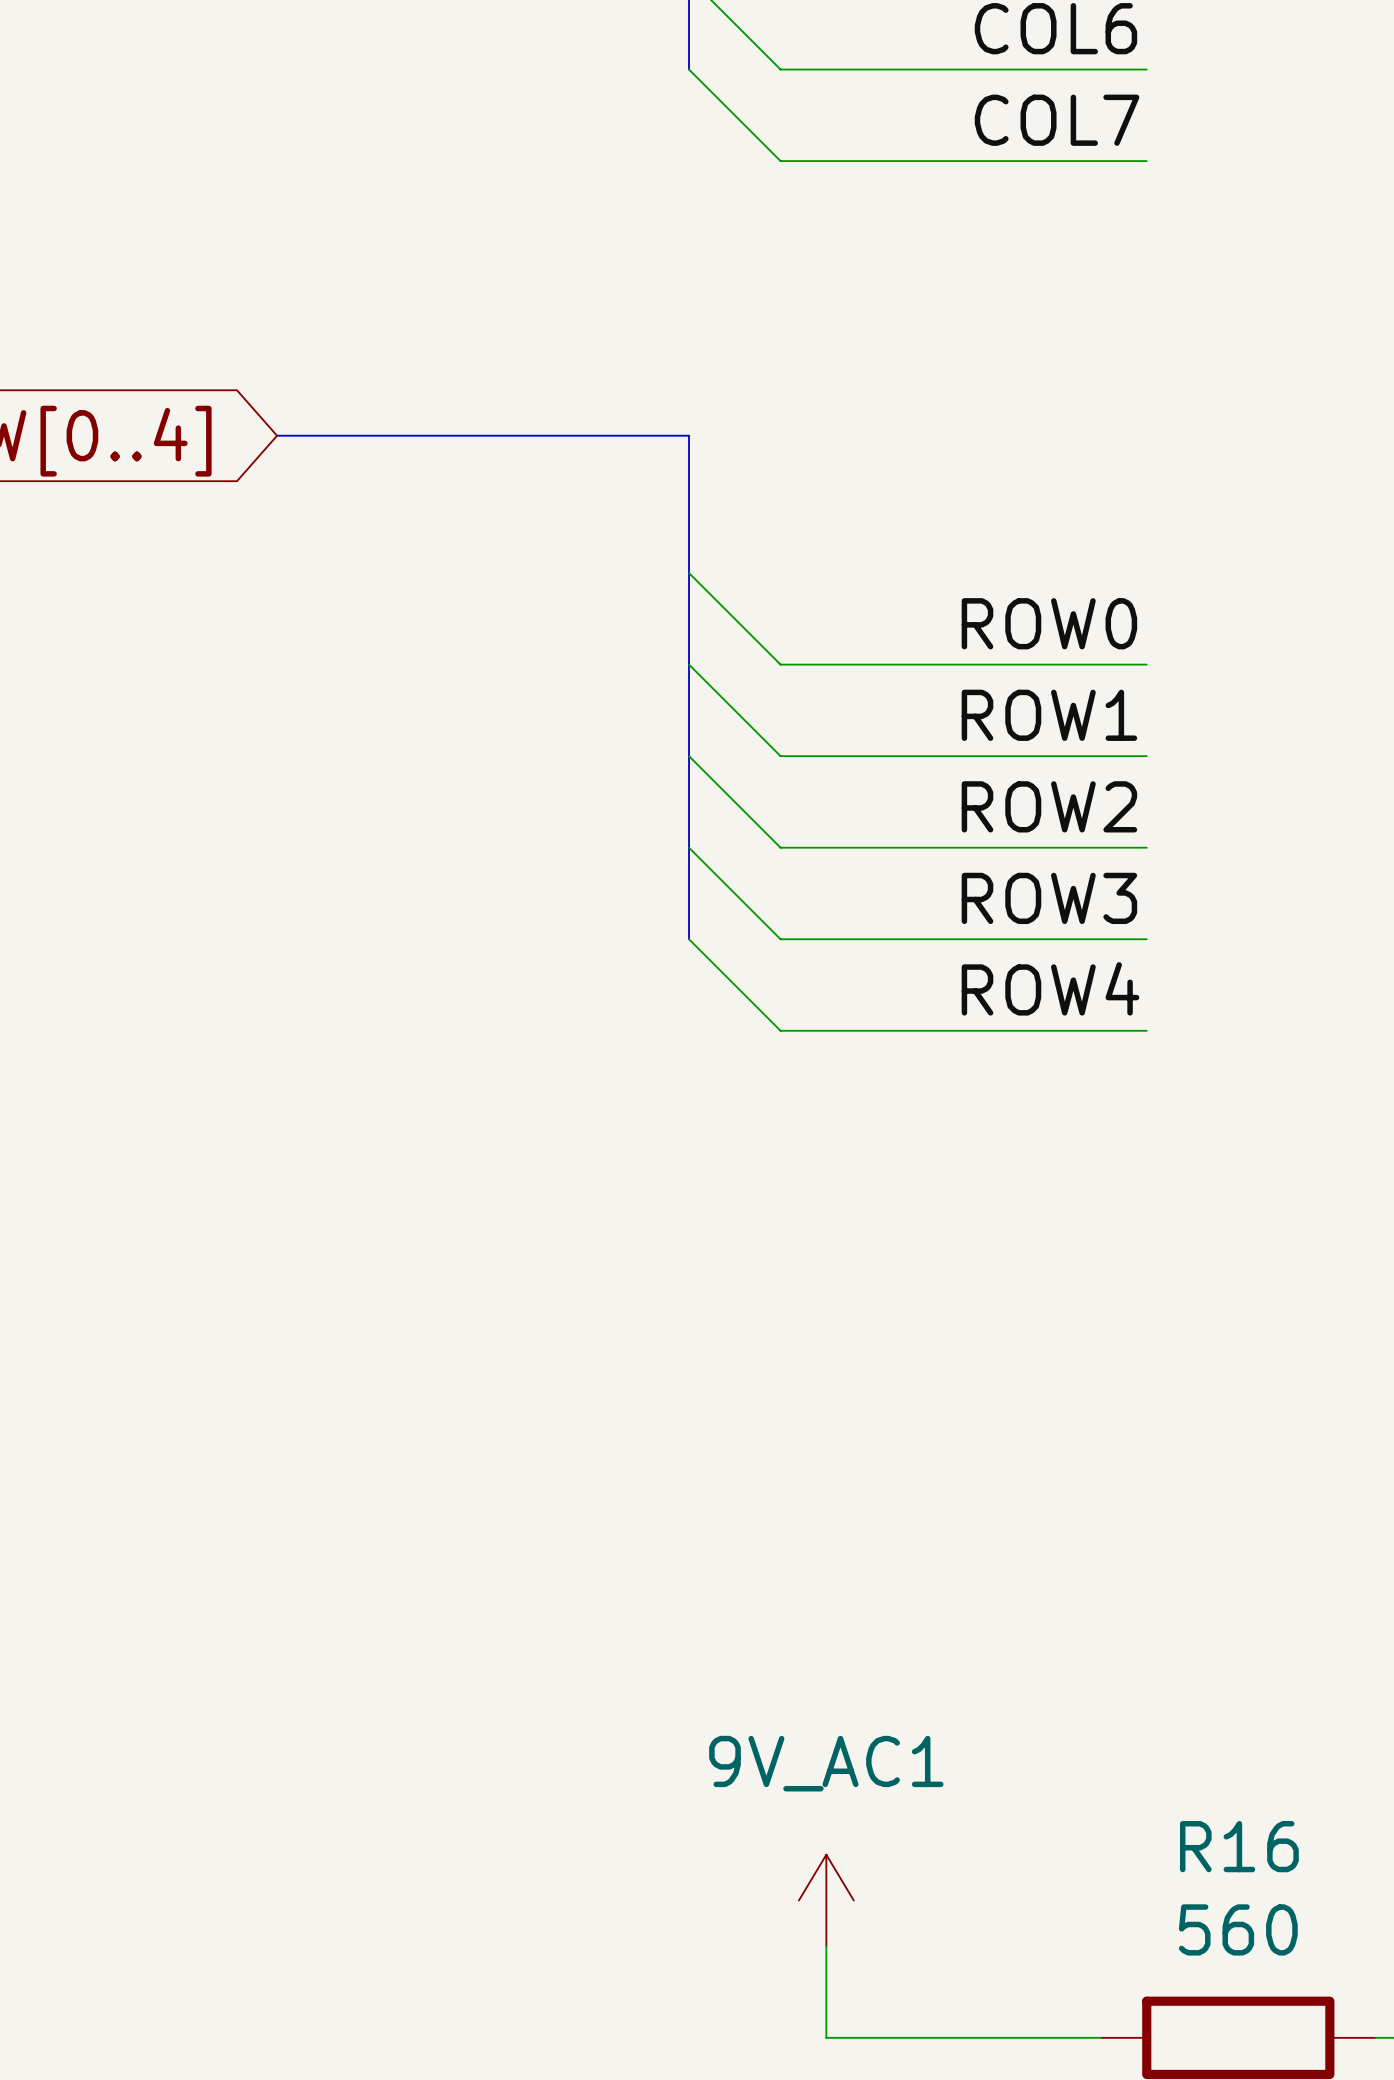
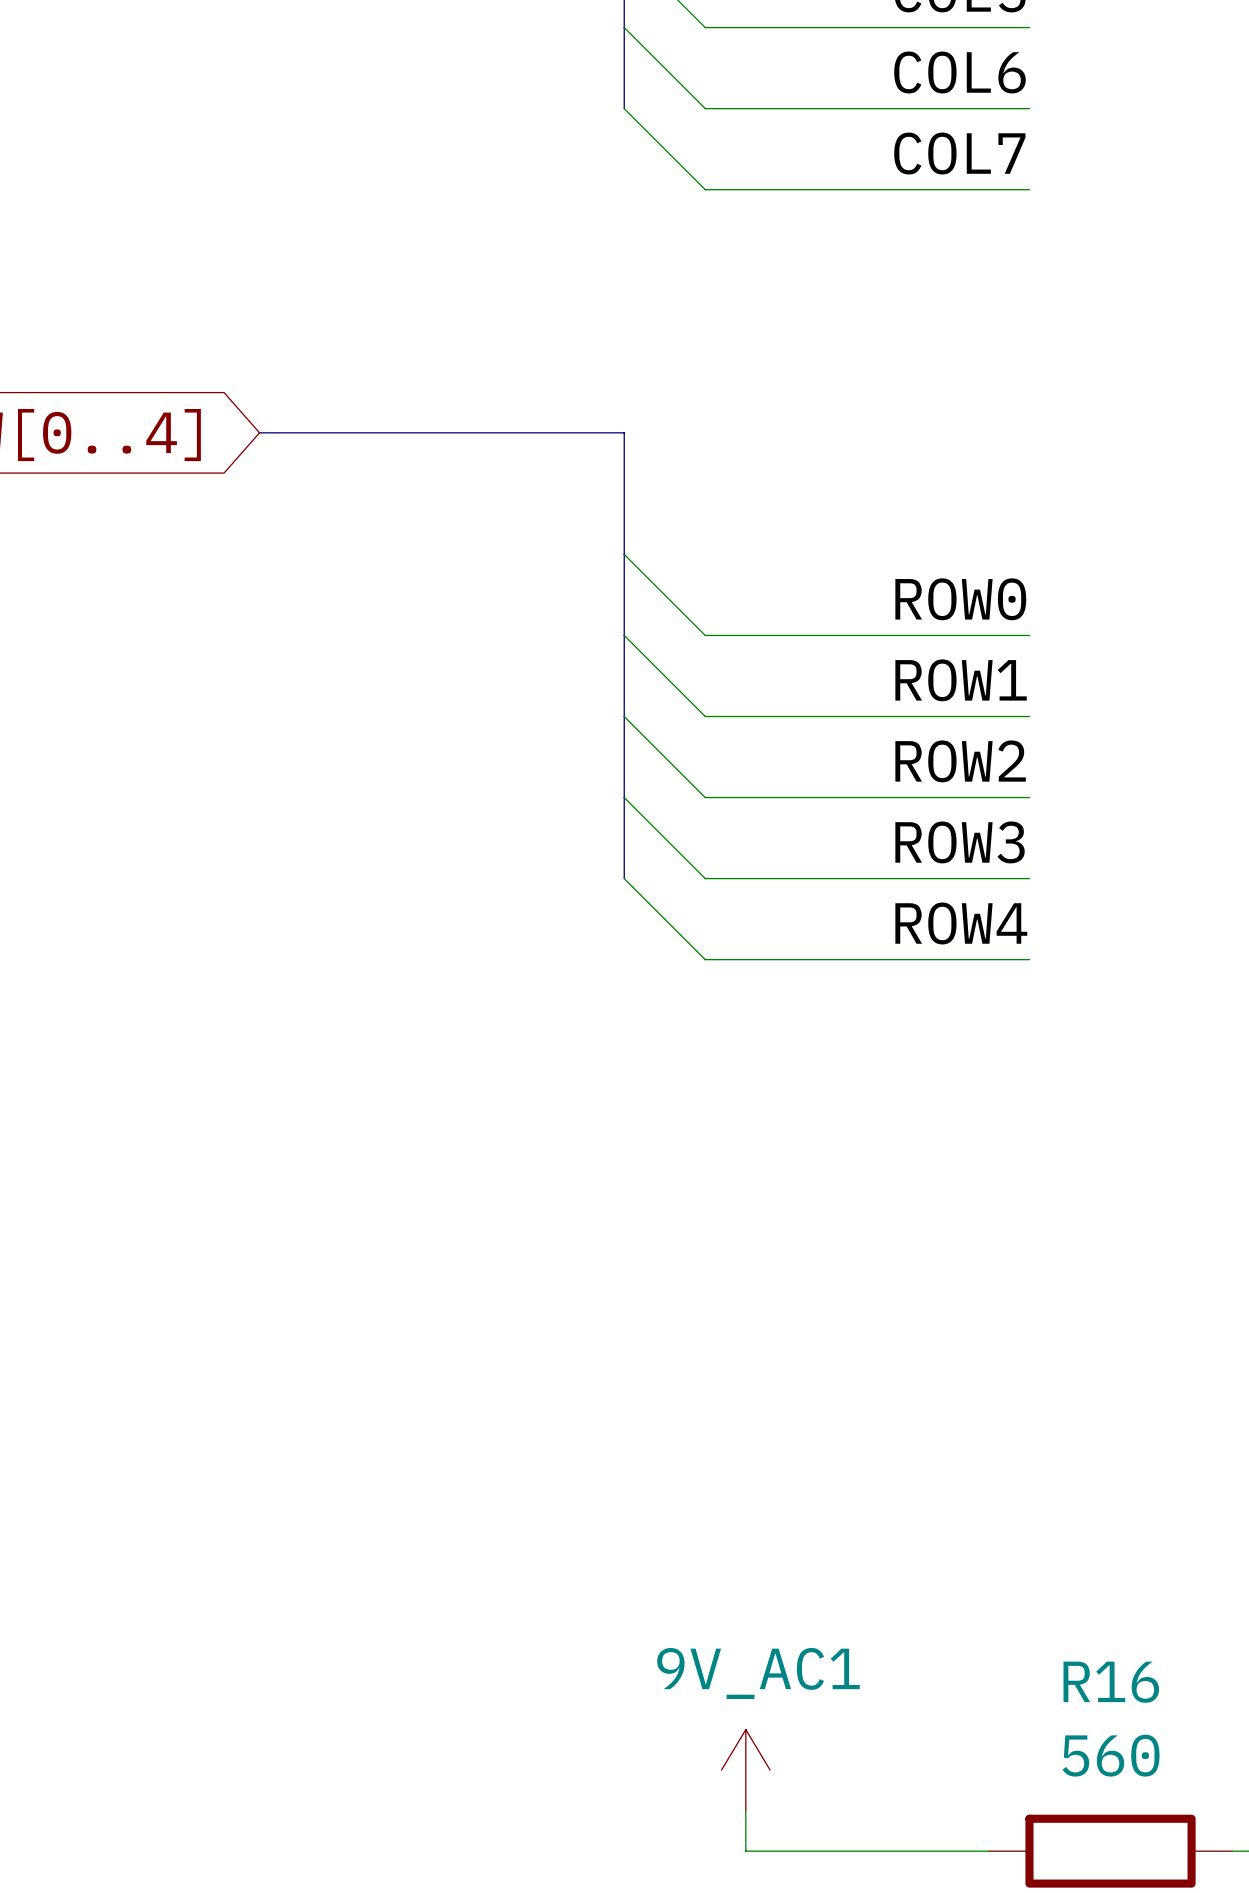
power symbol text position: 9V_AC1 (826, 1763) -> 9V_AC1 (758, 1673)
power symbol position: 9V_AC1 (826, 1900) -> 9V_AC1 (745, 1770)

